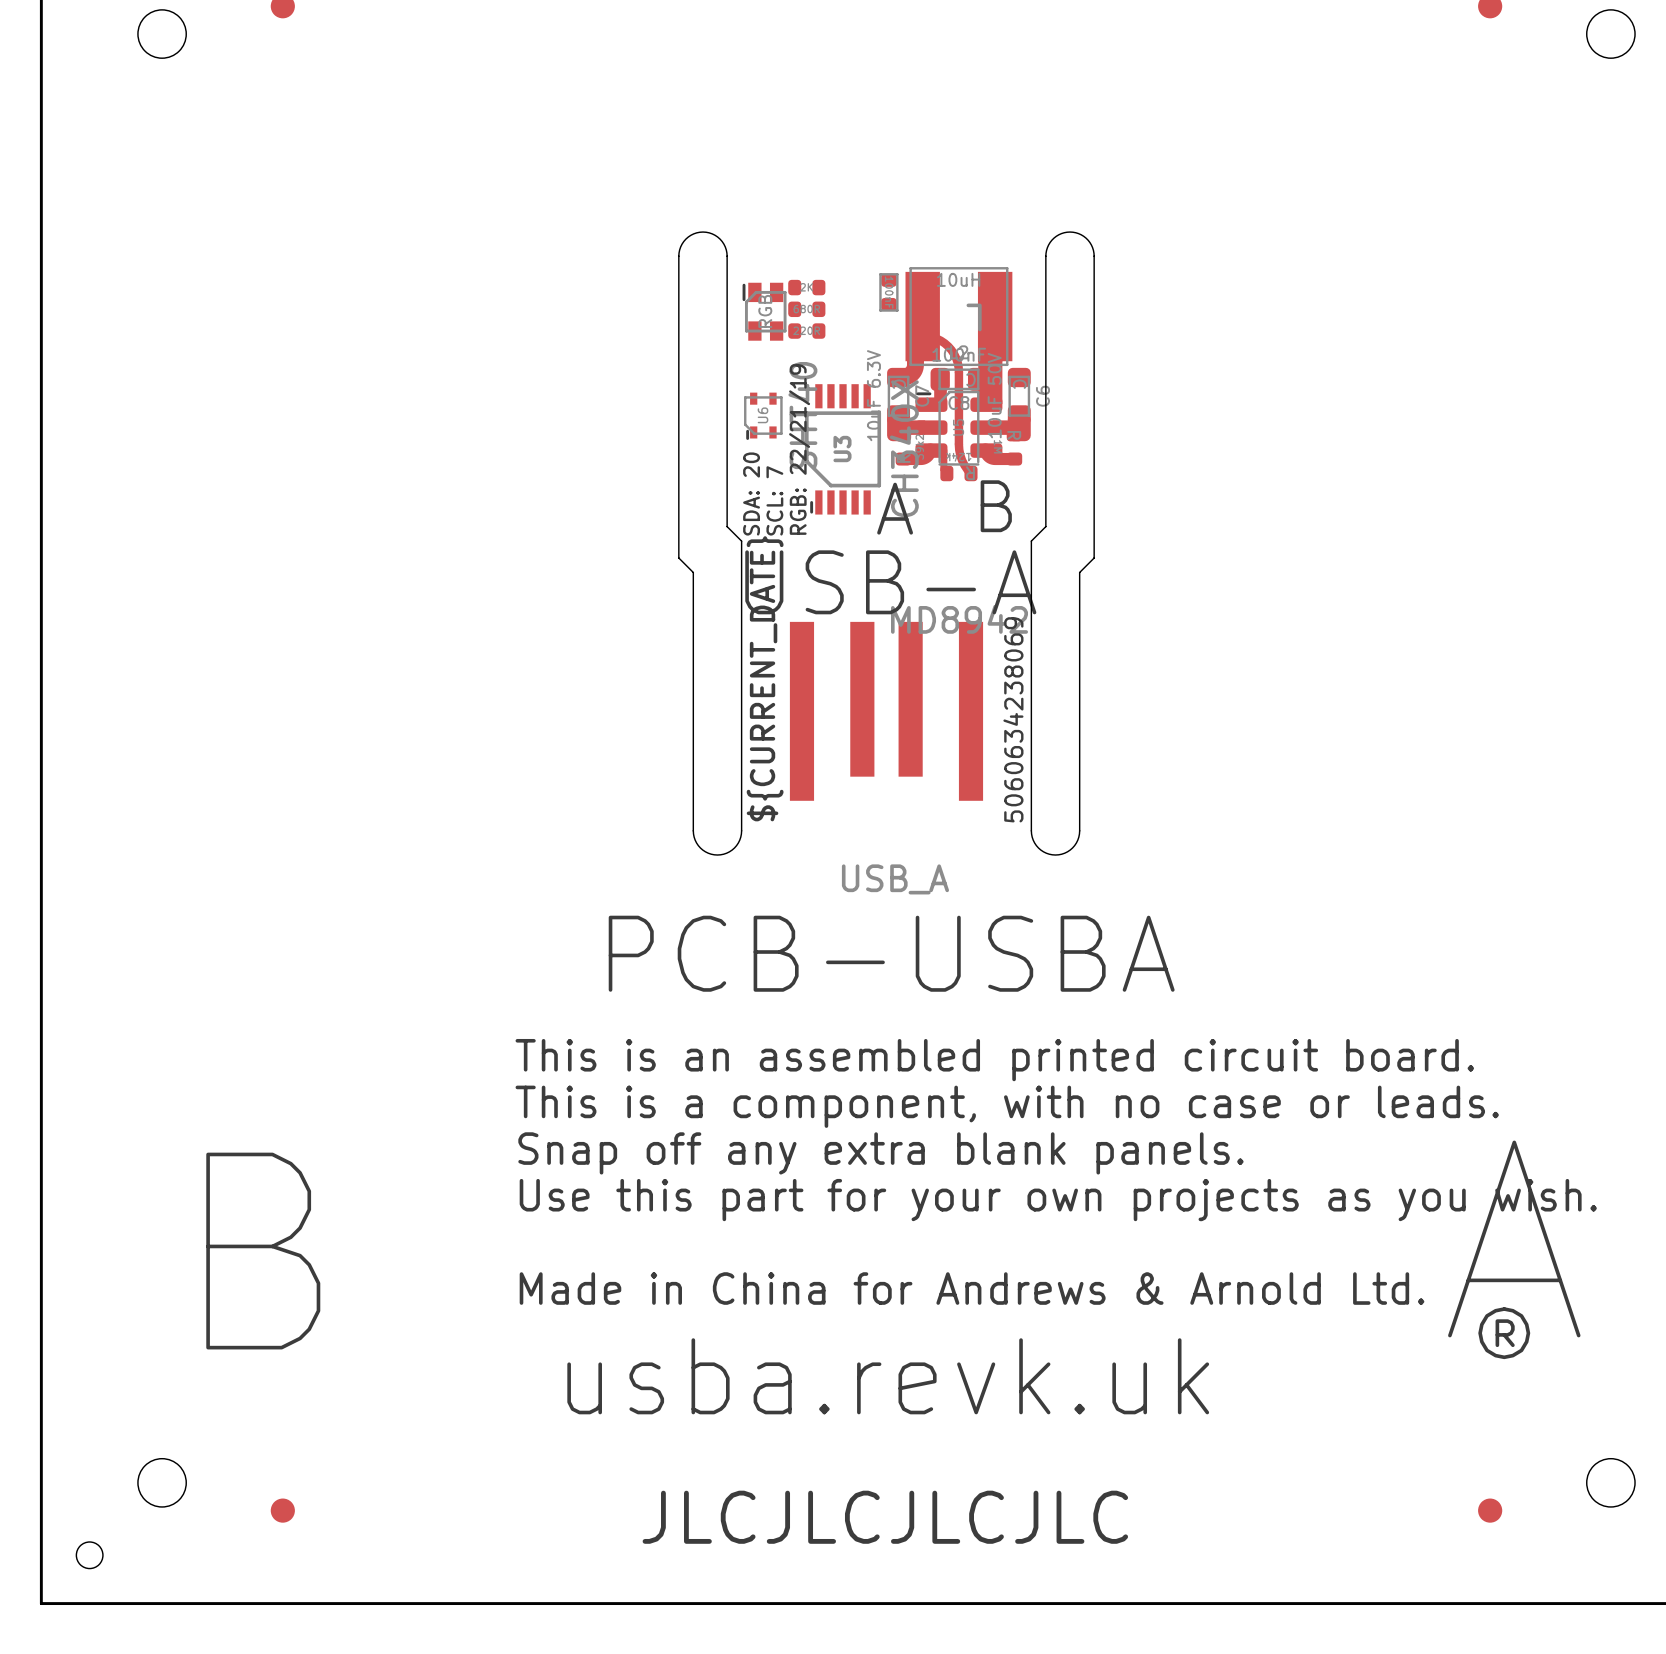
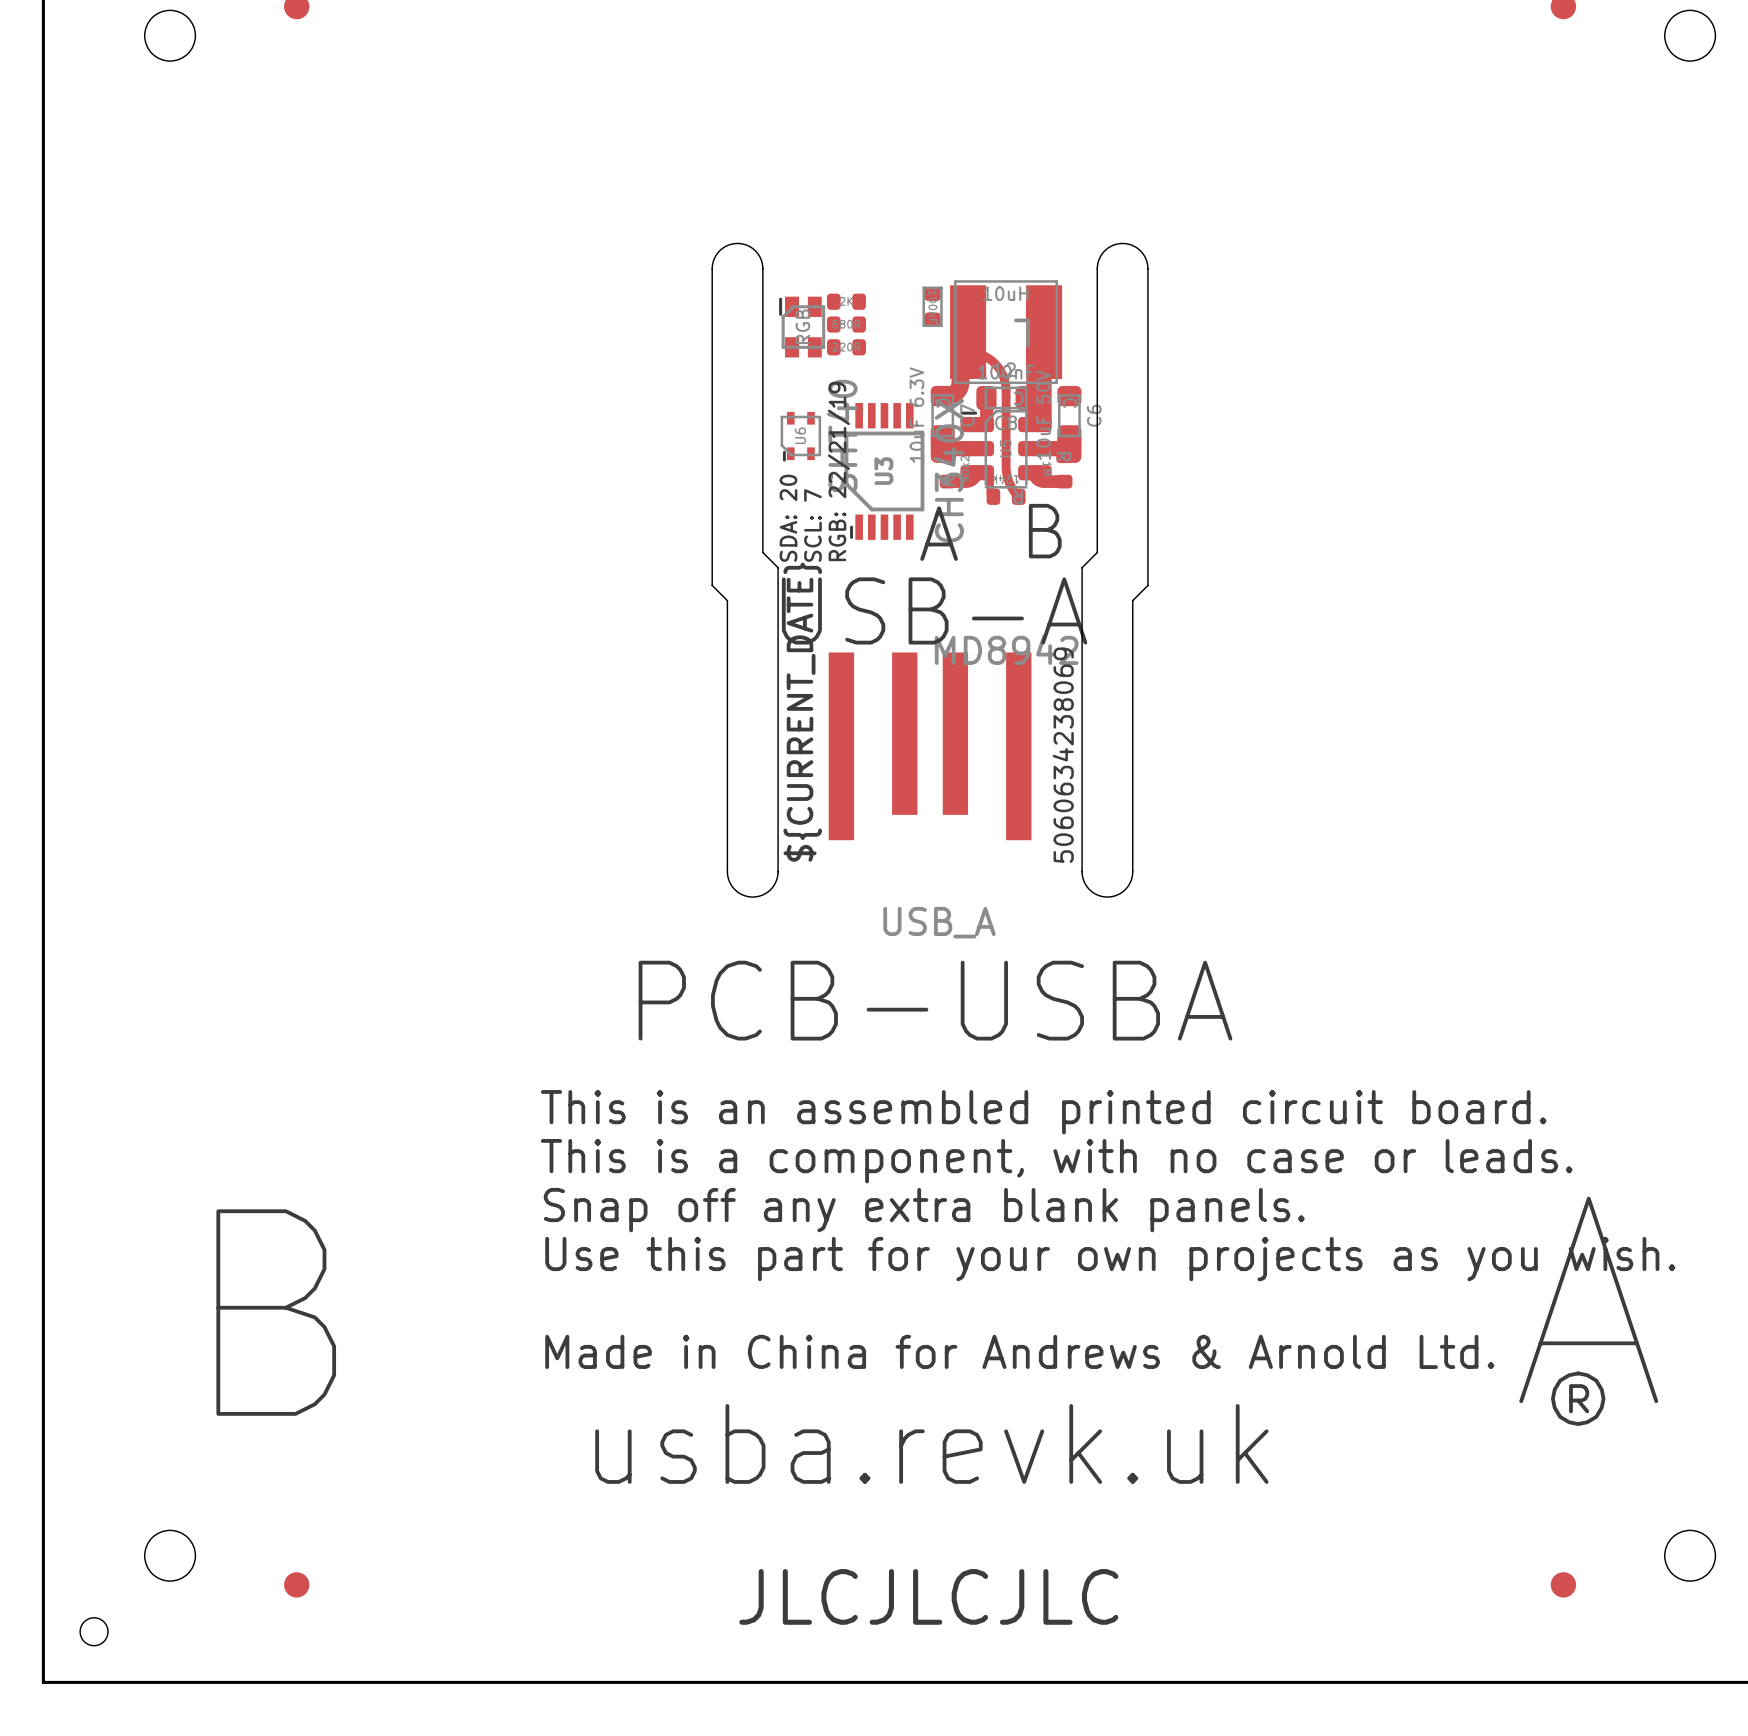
drawing shape: [896, 434, 925, 463] -> [940, 455, 970, 486]
part text: JLCJLCJLCJLC (885, 1517) -> none
text: none -> JLCJLCJLC (928, 1596)

